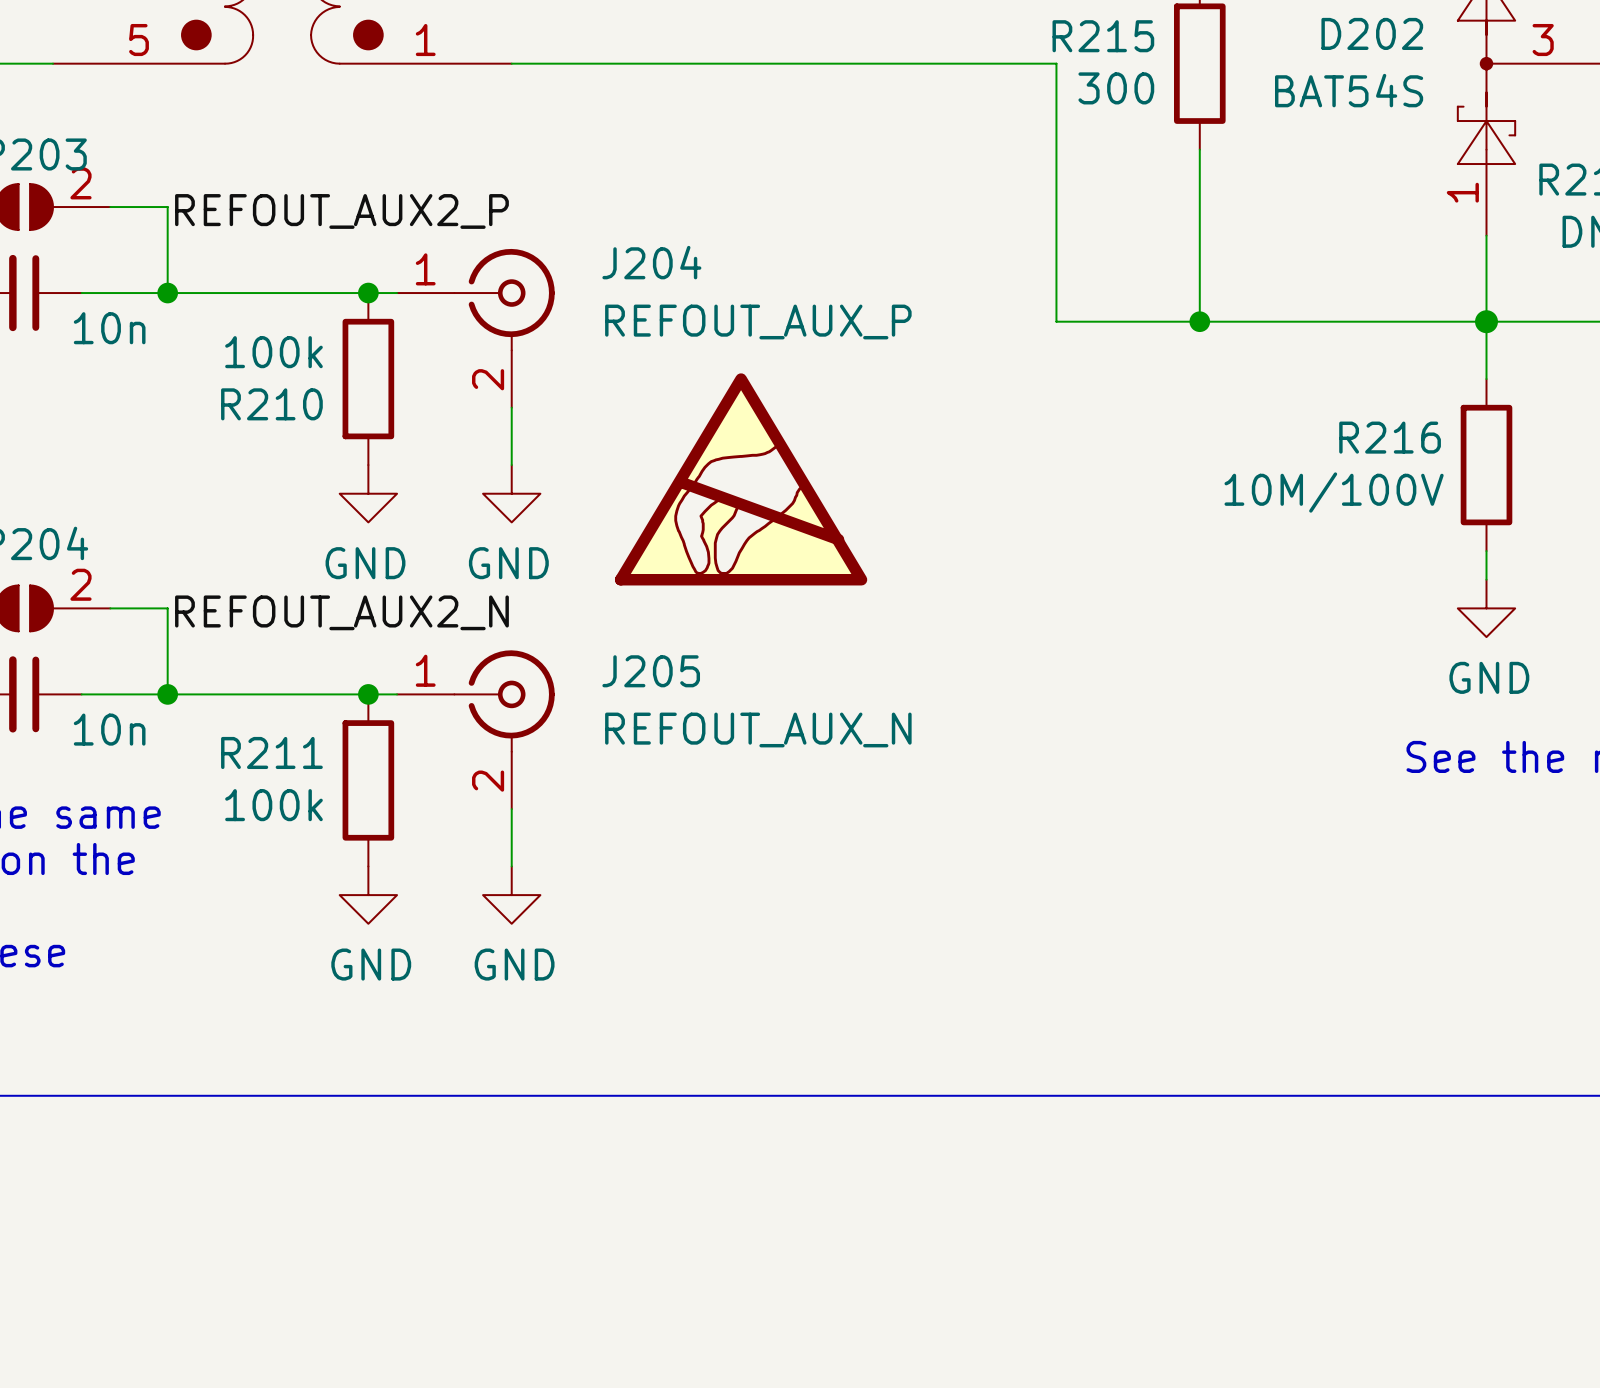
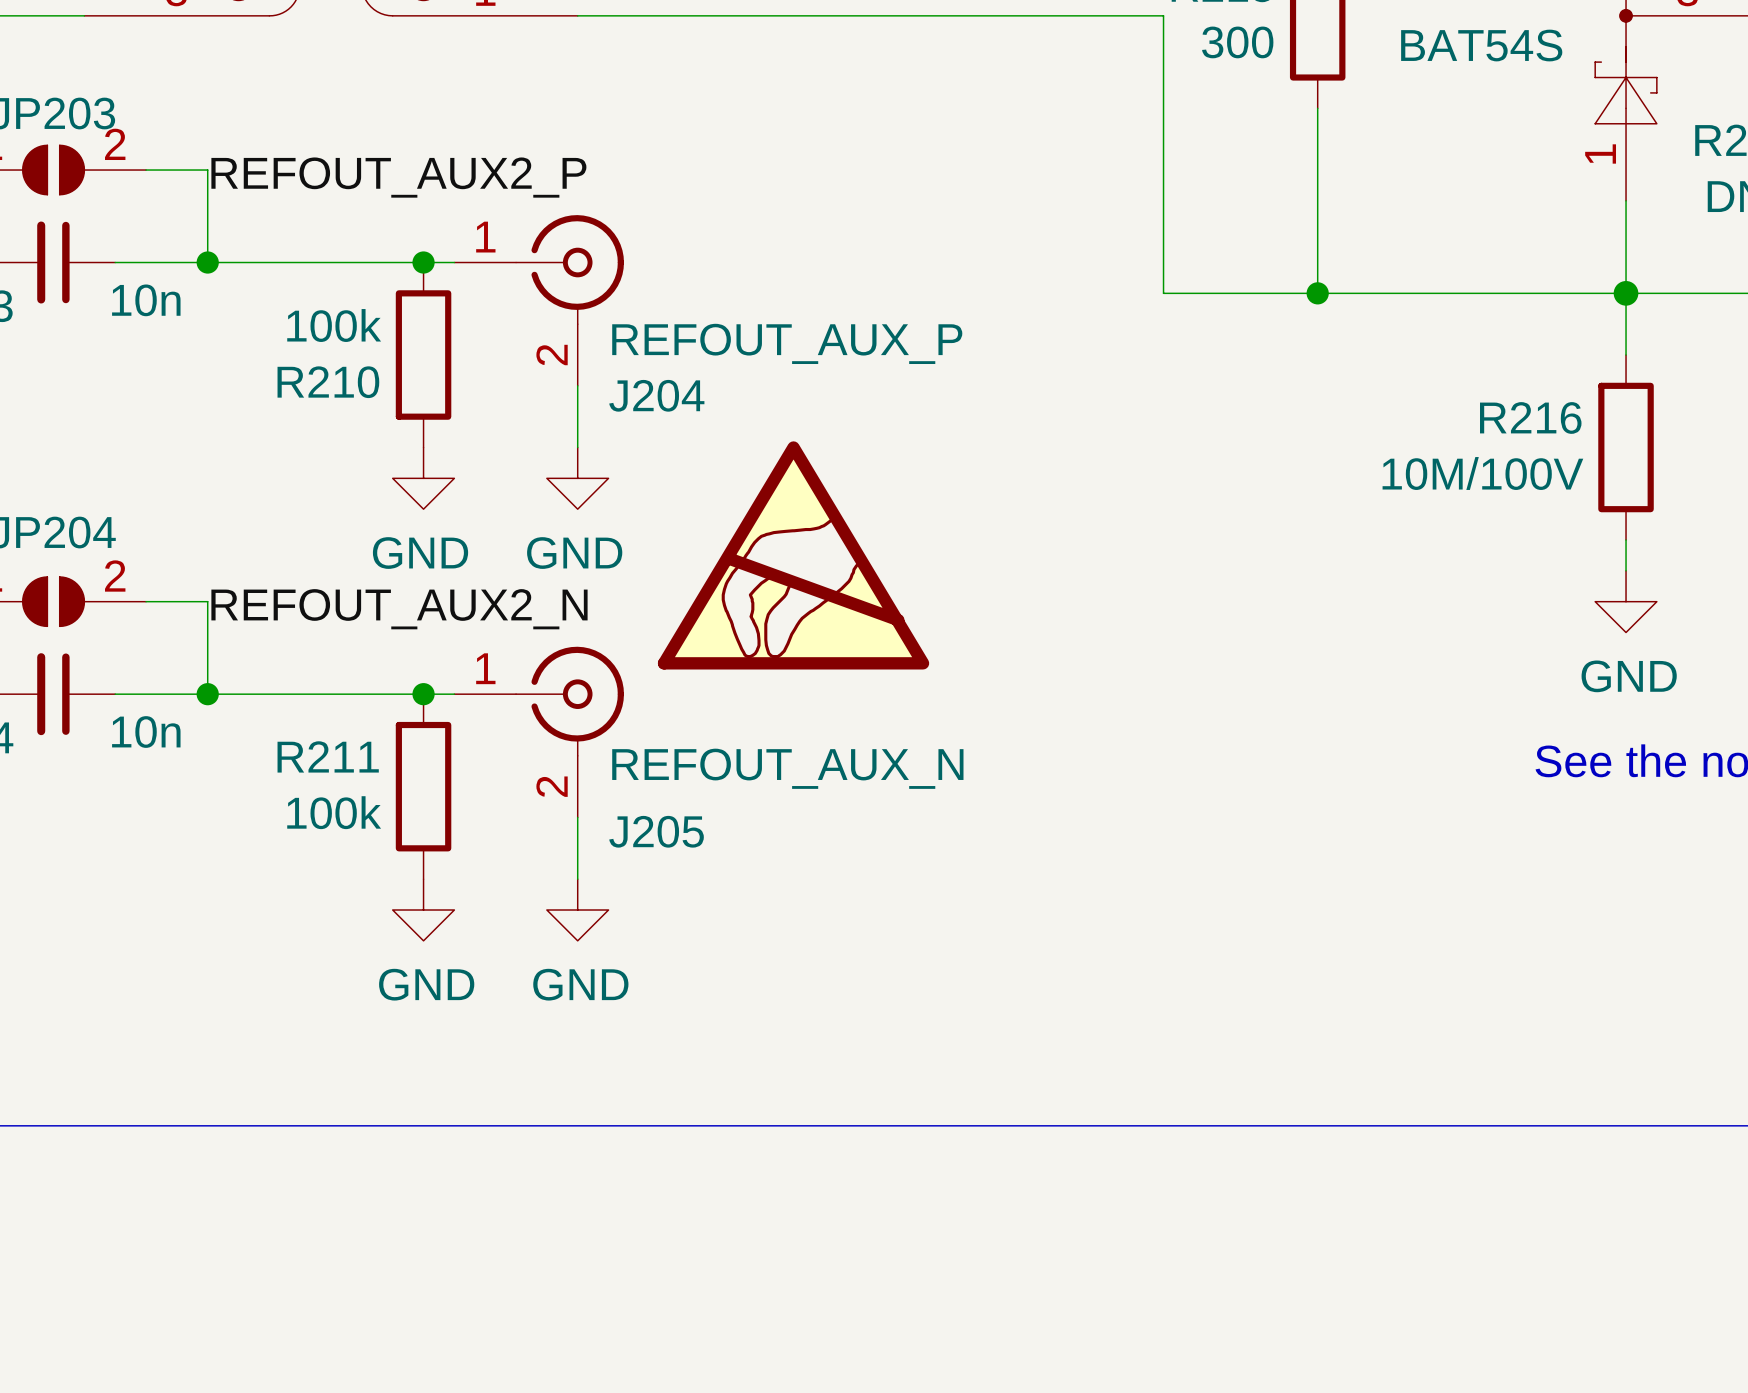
J204 name position: J204 (651, 262) -> J204 (656, 395)
J204 value position: REFOUT_AUX_P (758, 321) -> REFOUT_AUX_P (787, 343)
power symbol position: (741, 479) -> (793, 555)
J205 name position: J205 (651, 671) -> J205 (656, 831)
J205 value position: REFOUT_AUX_N (758, 729) -> REFOUT_AUX_N (787, 768)

